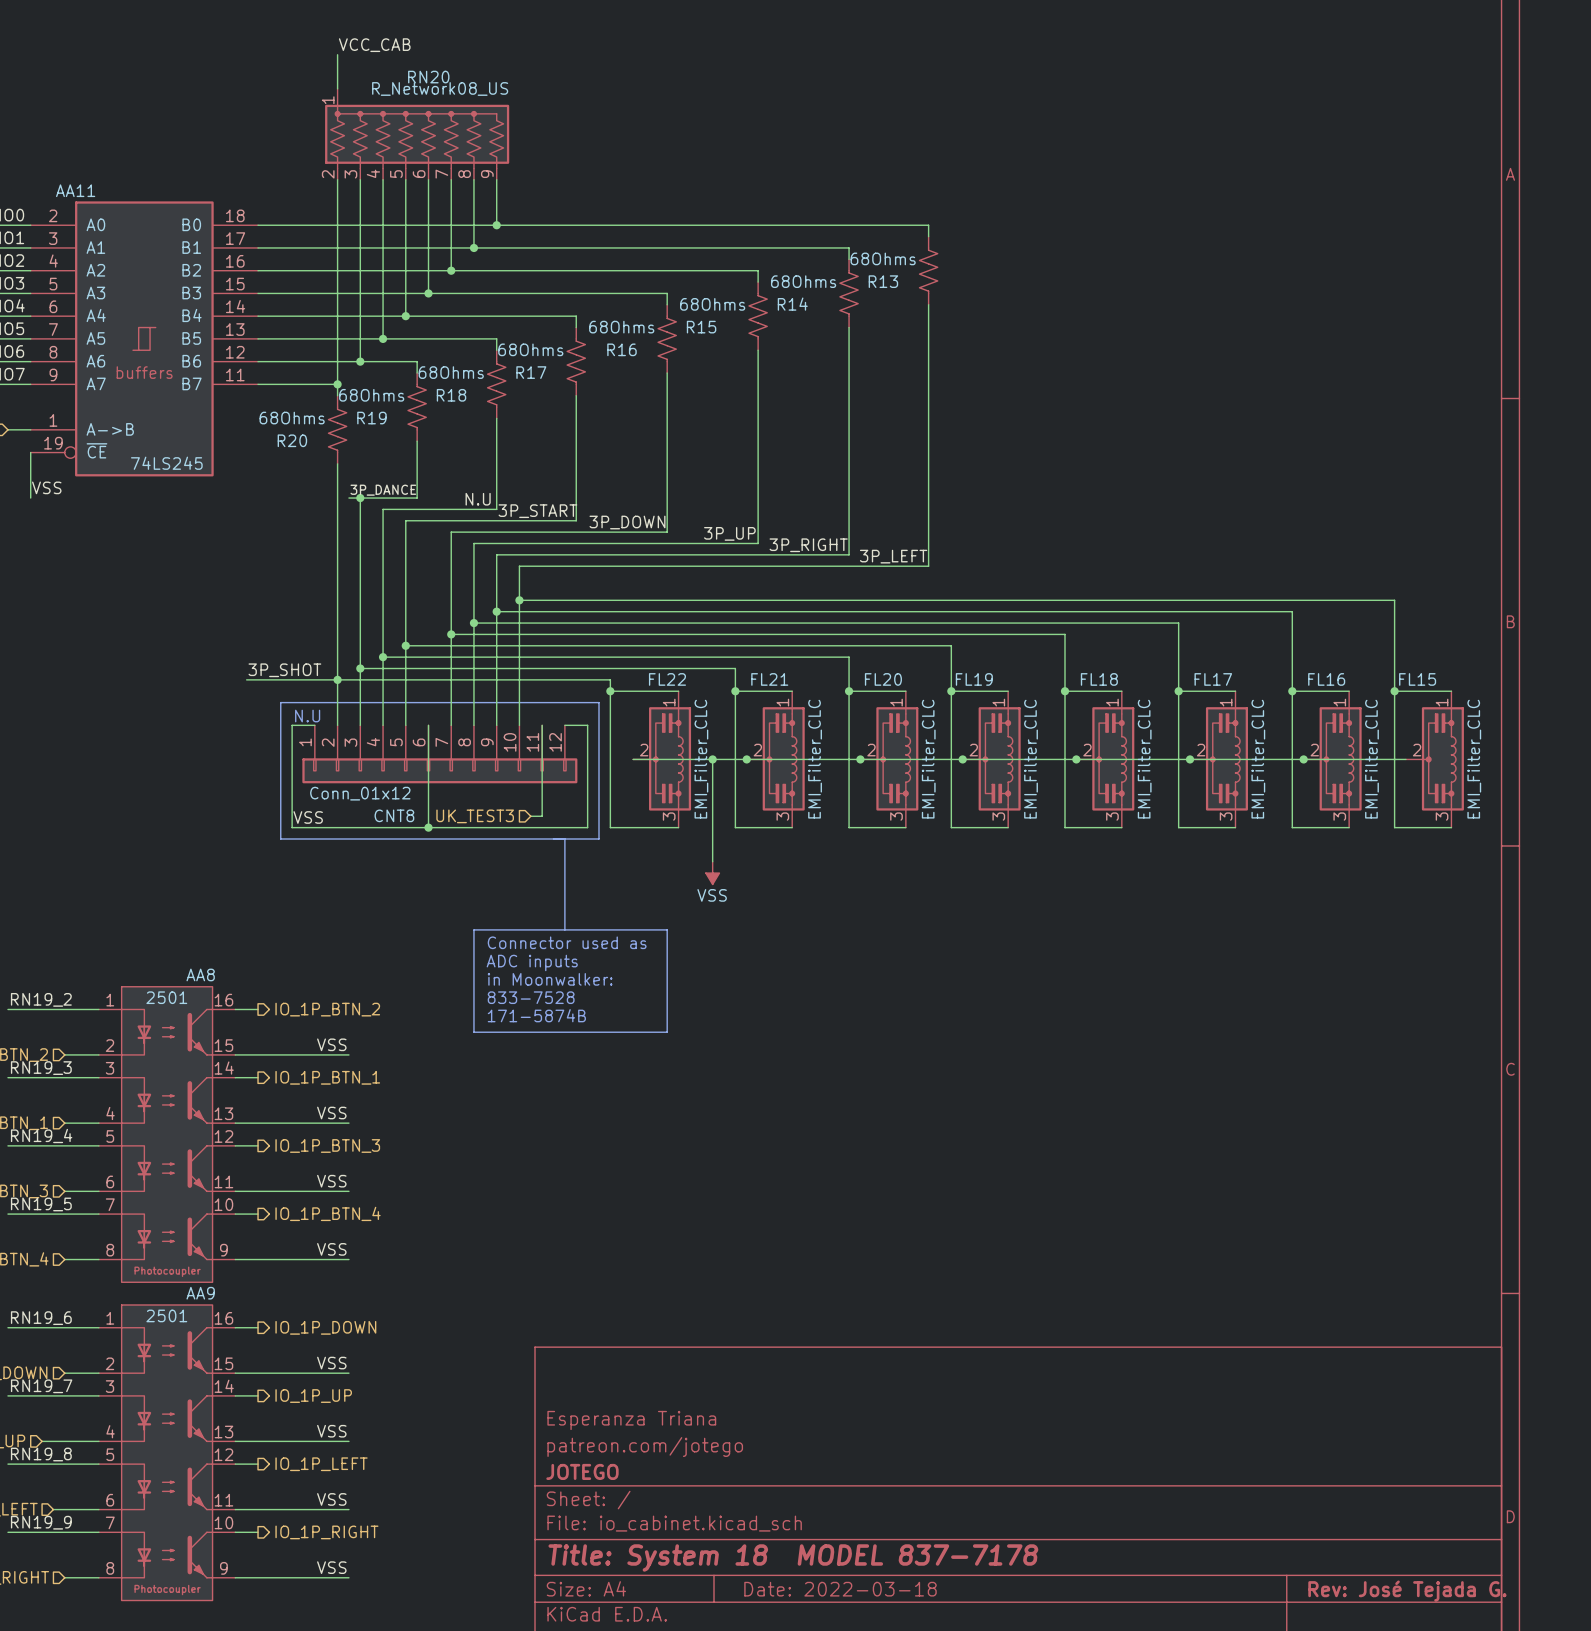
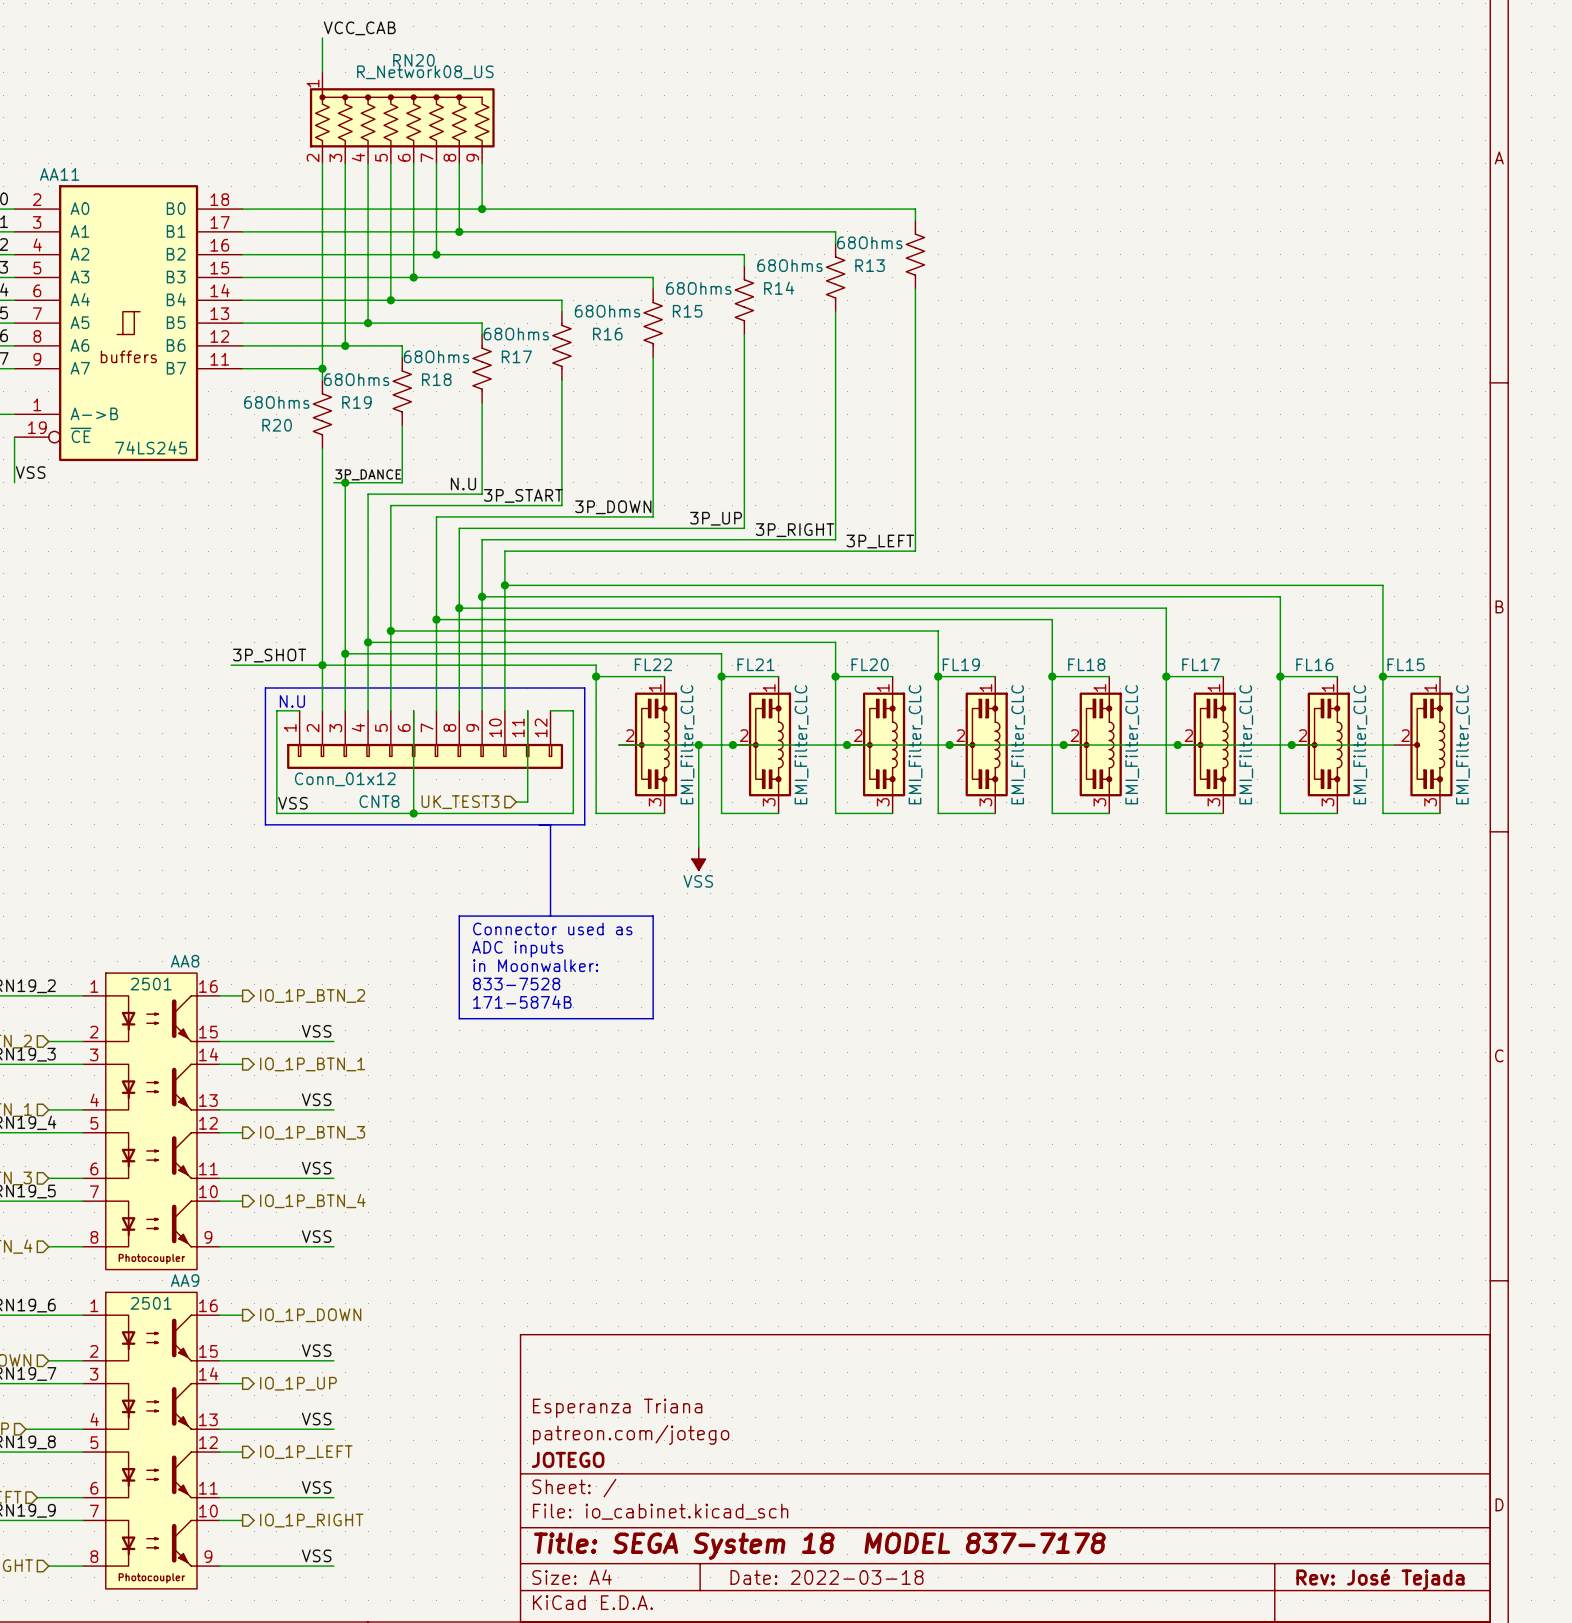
title block: Title: System 18 MODEL 837-7178 (793, 1557) -> Title: SEGA System 18 MODEL 837-7178 (819, 1546)
title block: Rev: José Tejada G. (1407, 1591) -> Rev: José Tejada (1380, 1579)

